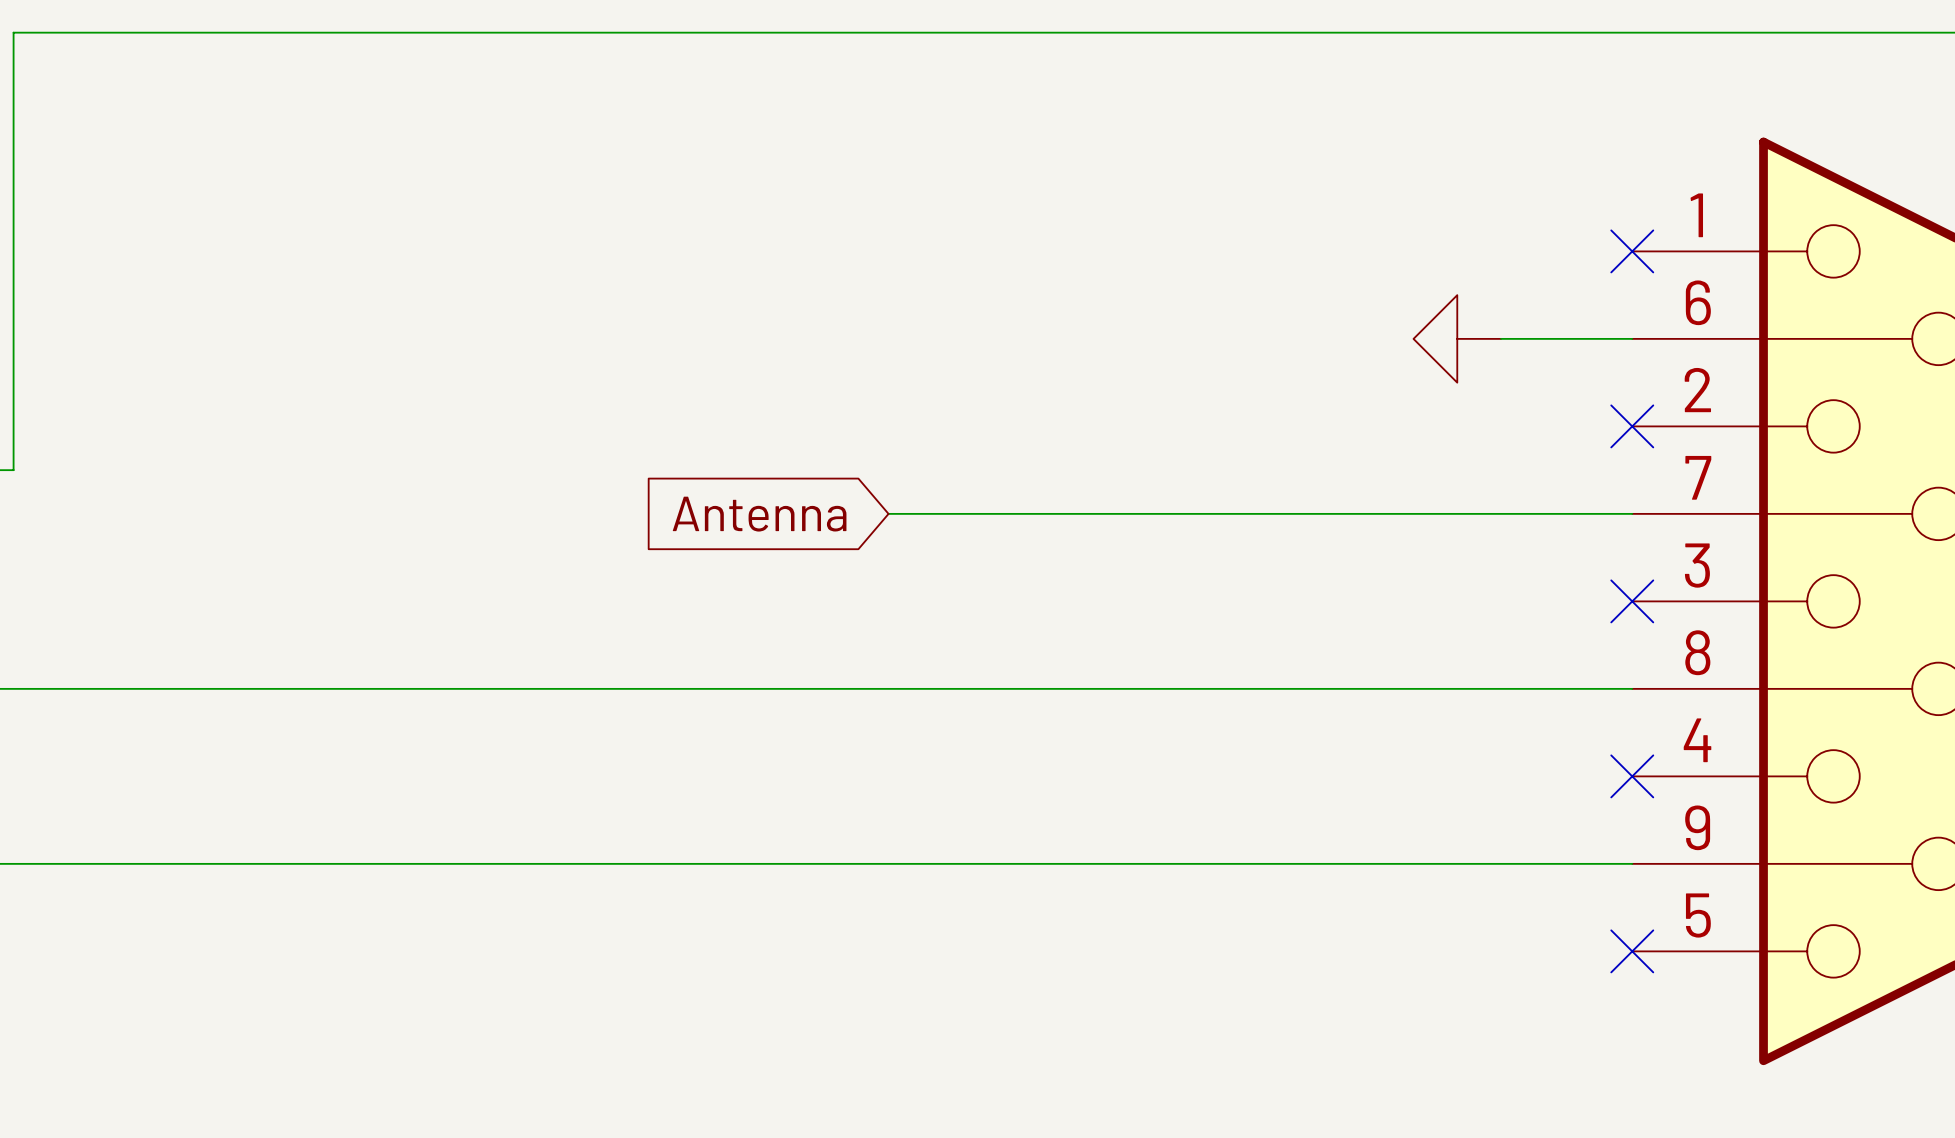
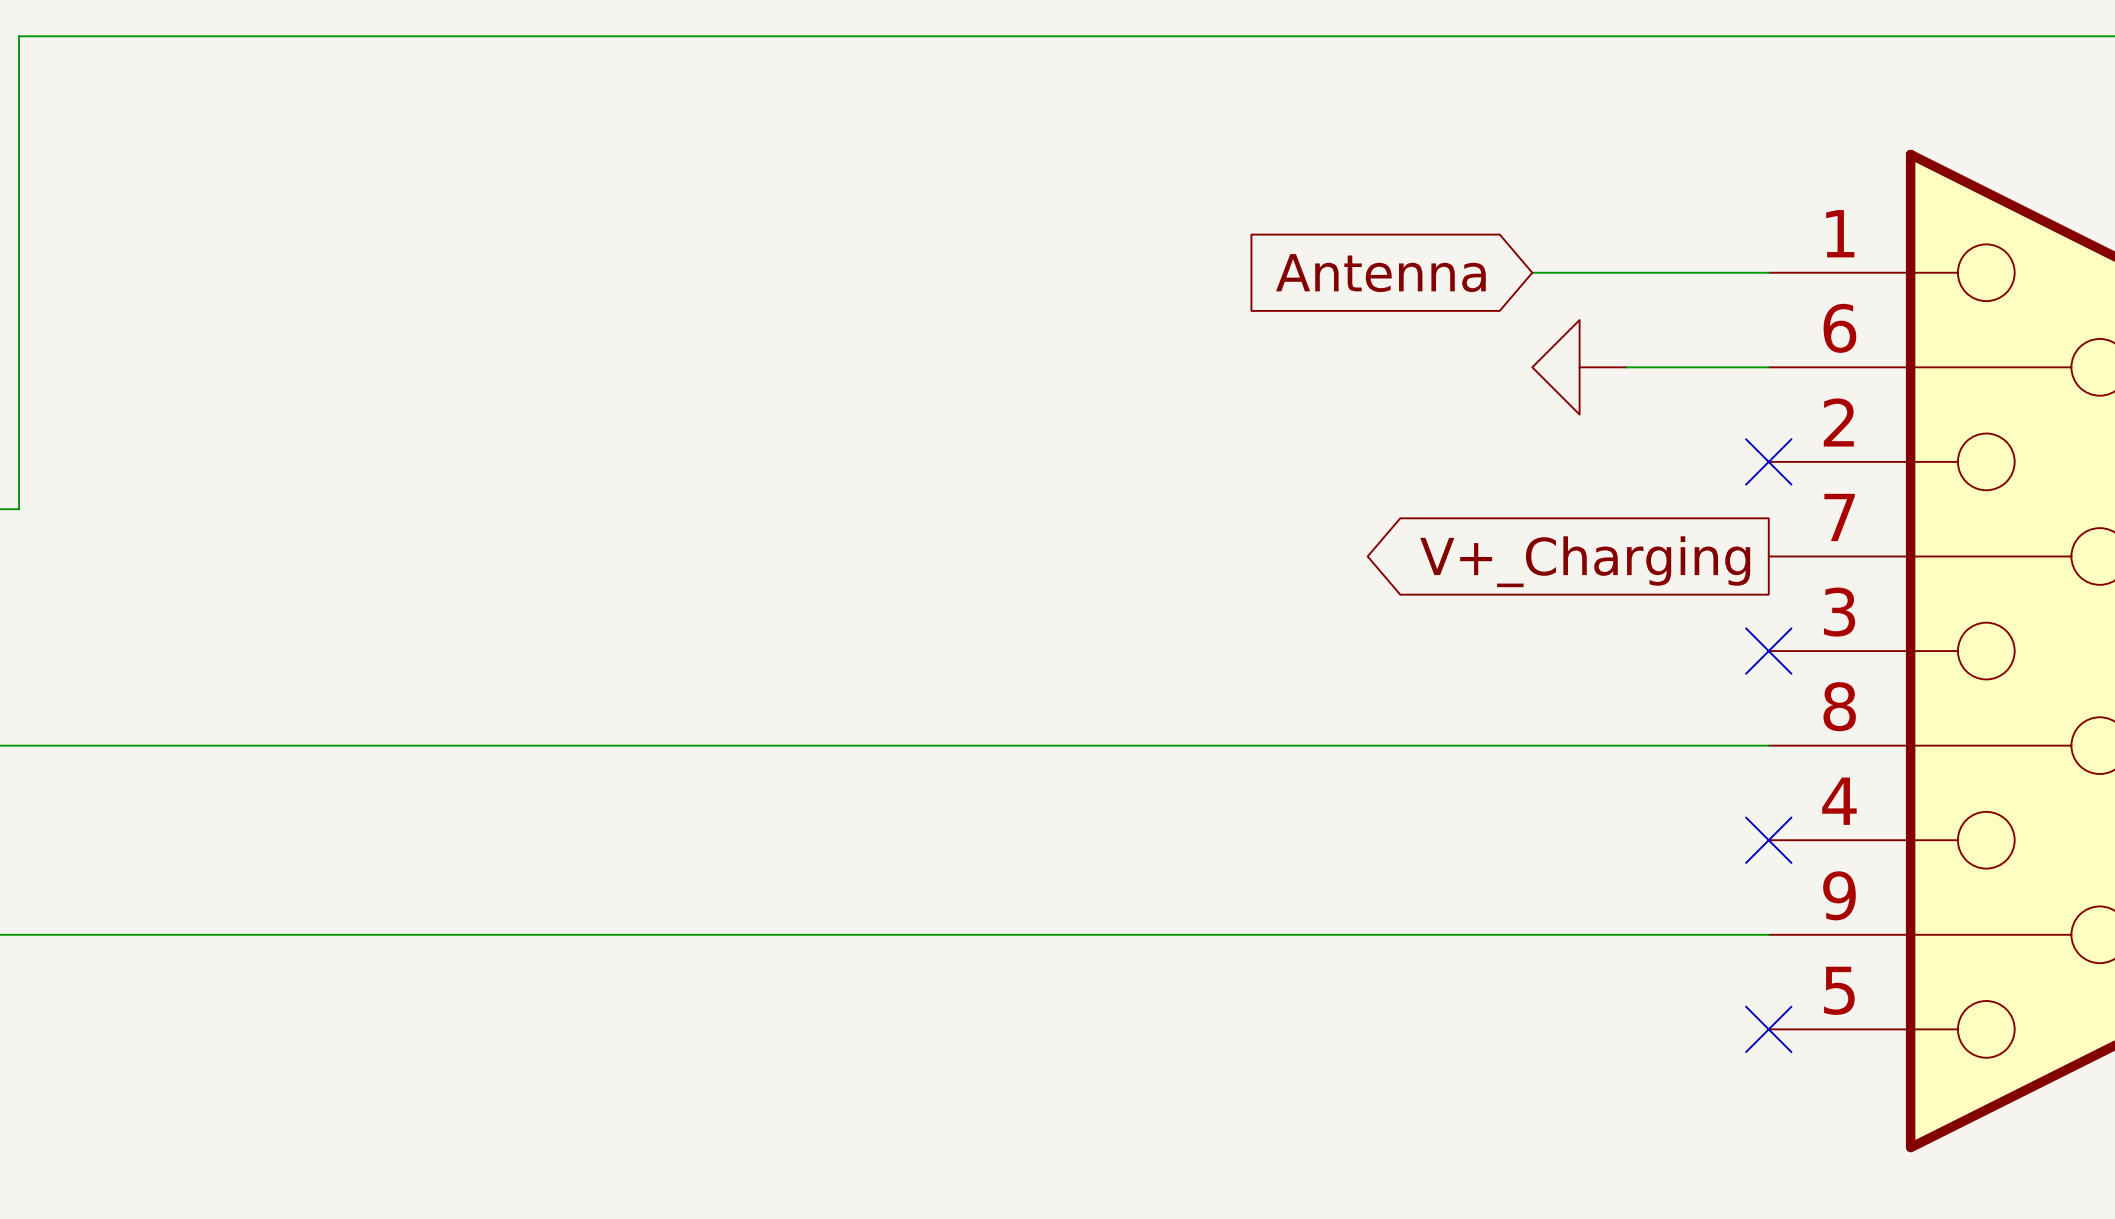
wire: none -> (1532, 272) (1768, 272)
no-connect mark: (1632, 251) -> none
wire: (888, 513) (1632, 513) -> none
global label position: Antenna (759, 514) -> Antenna (1380, 273)
global label: none -> V+_Charging (1585, 561)

